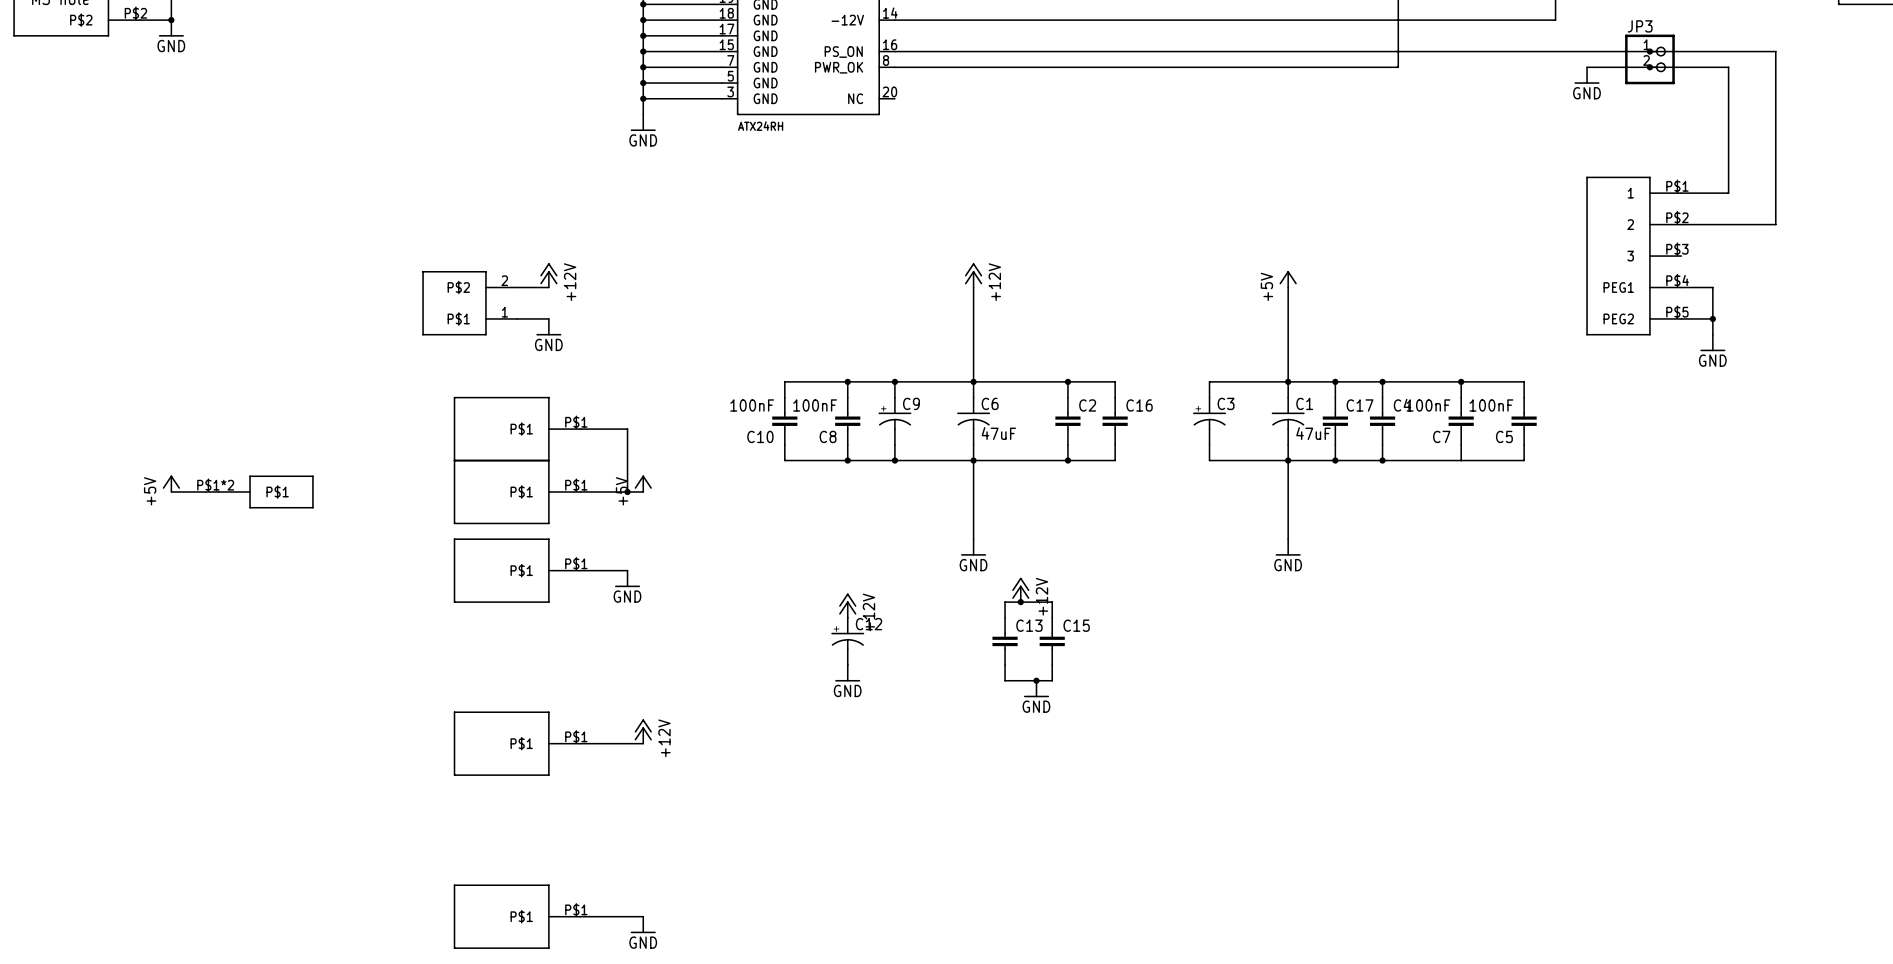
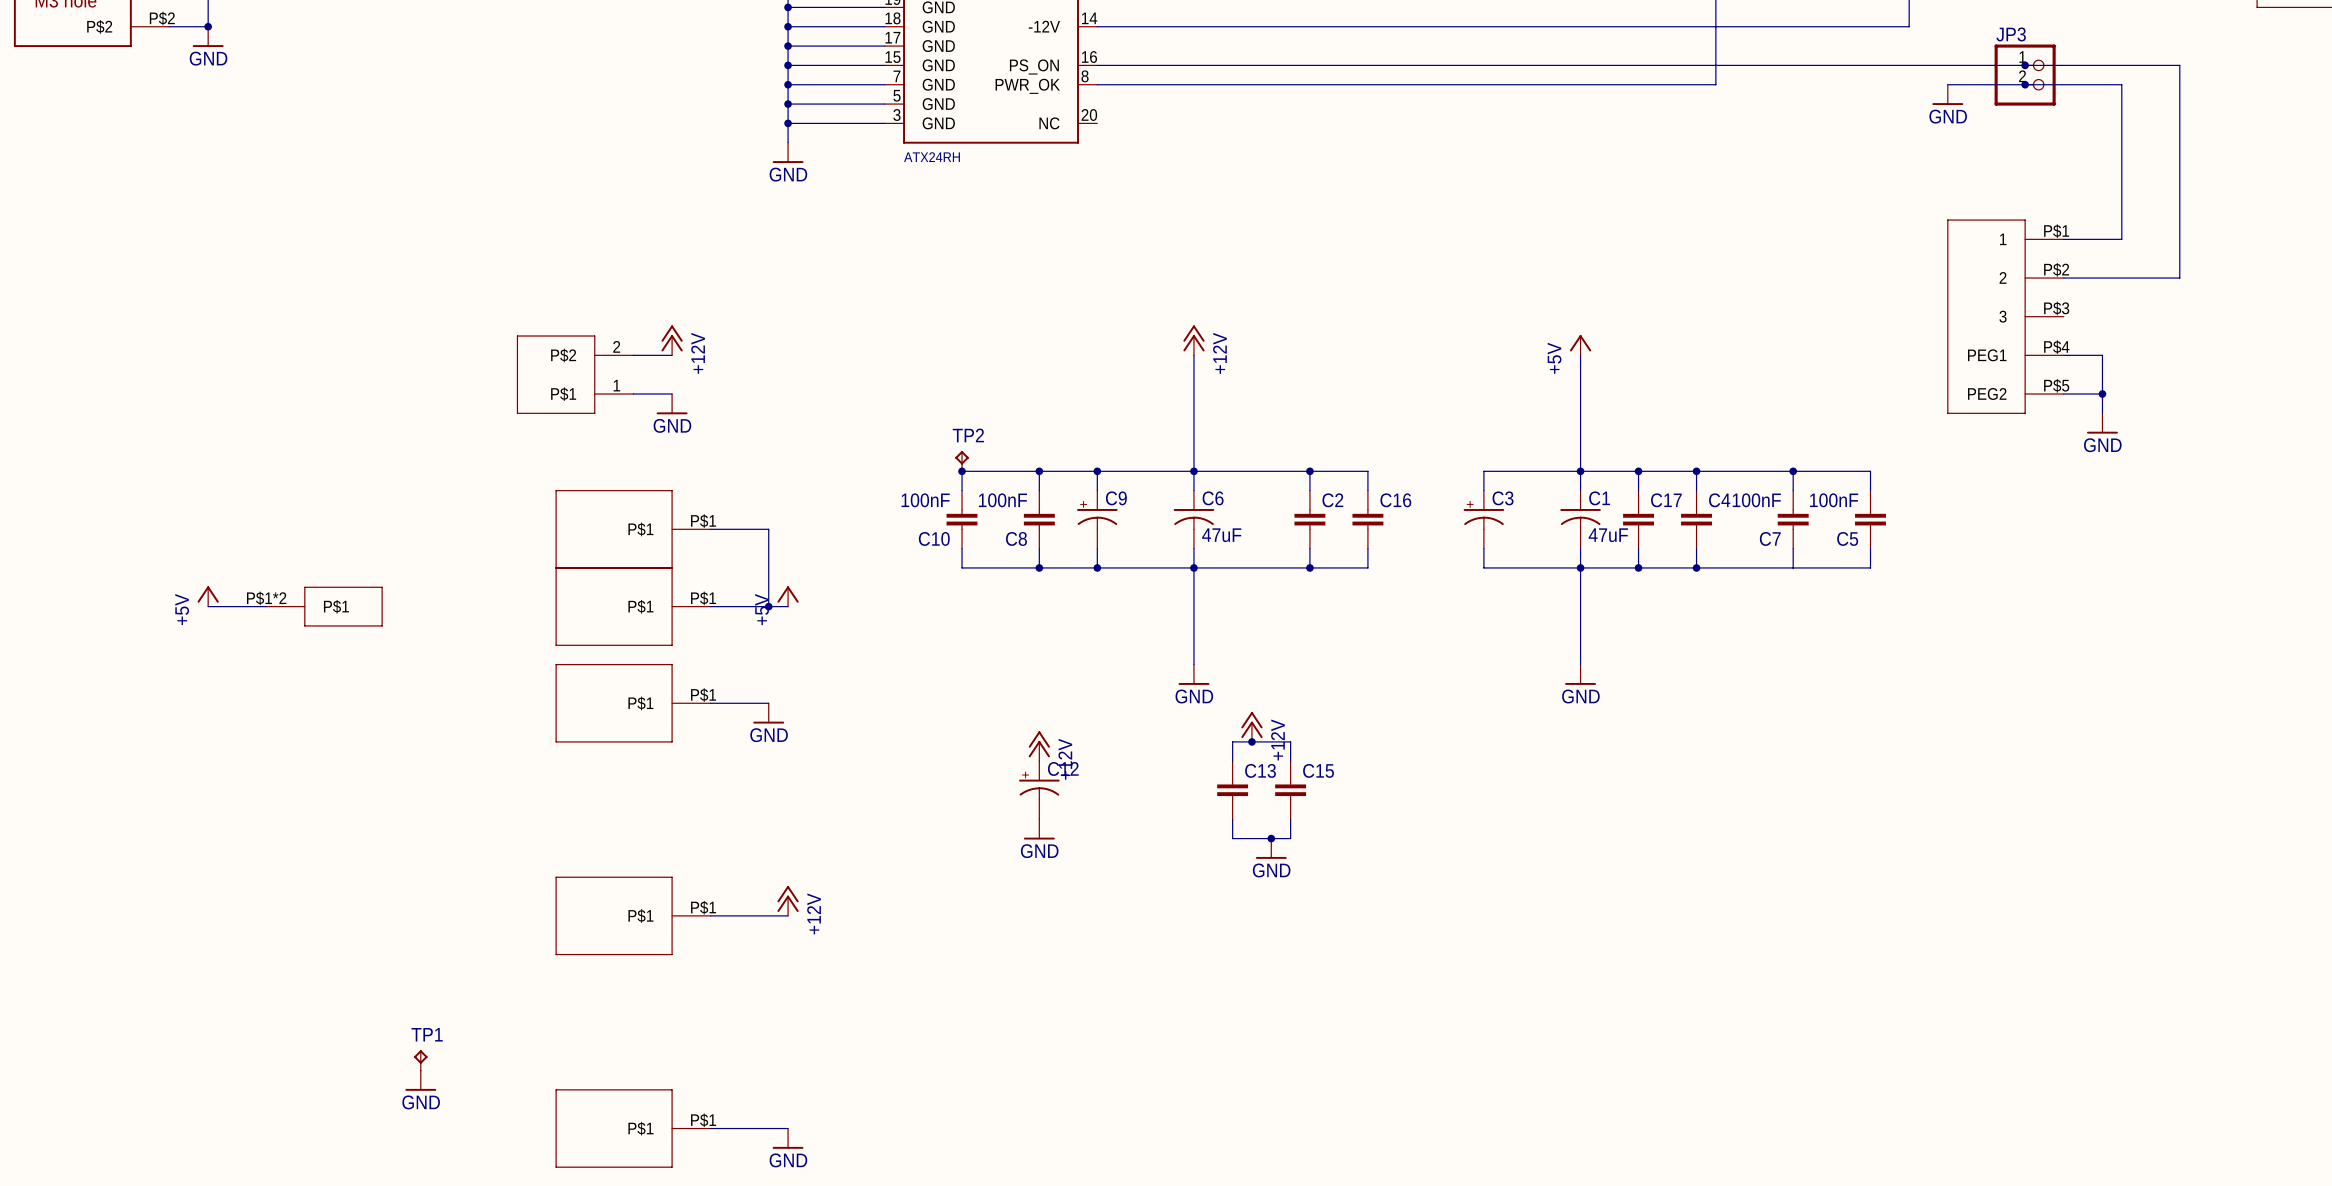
TP2: none -> (962, 461)
junction: none -> (962, 471)
TP1: none -> (420, 1060)
power symbol: none -> GND (420, 1080)

